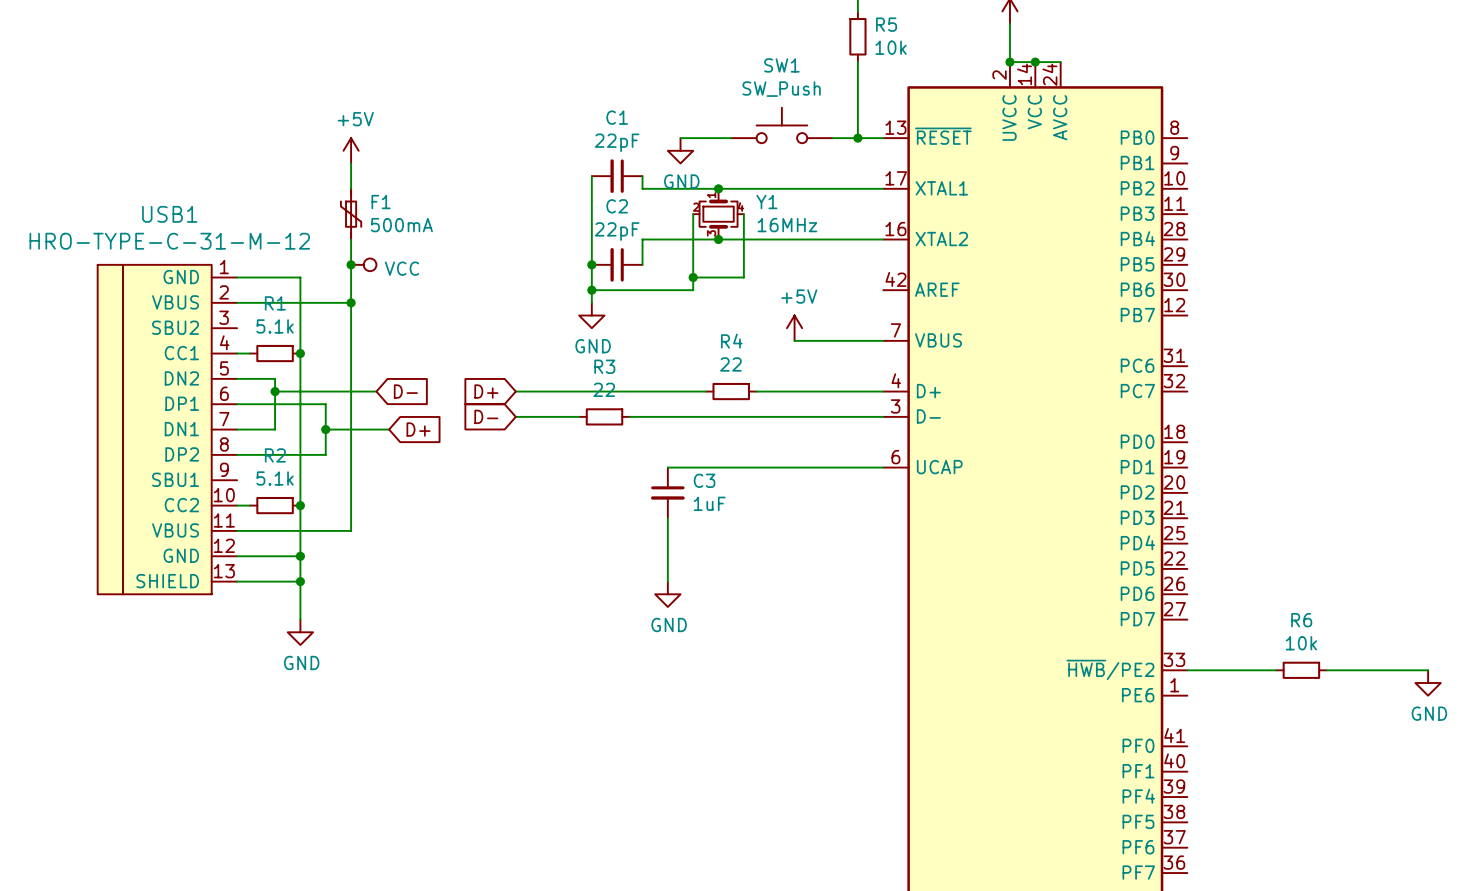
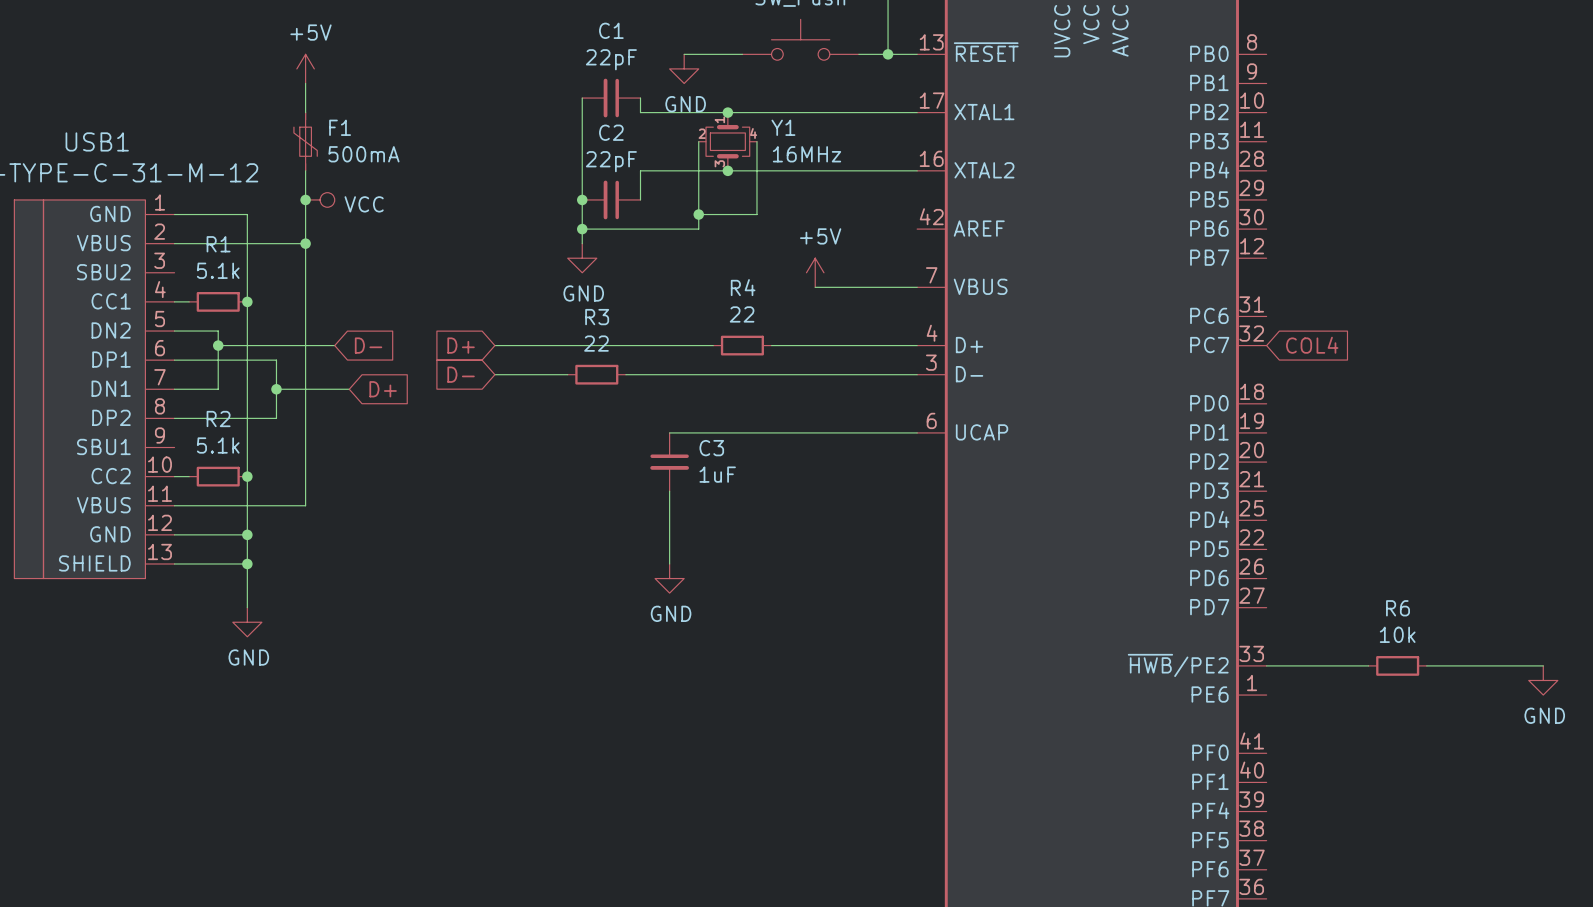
global label: none -> COL4 (1312, 345)

